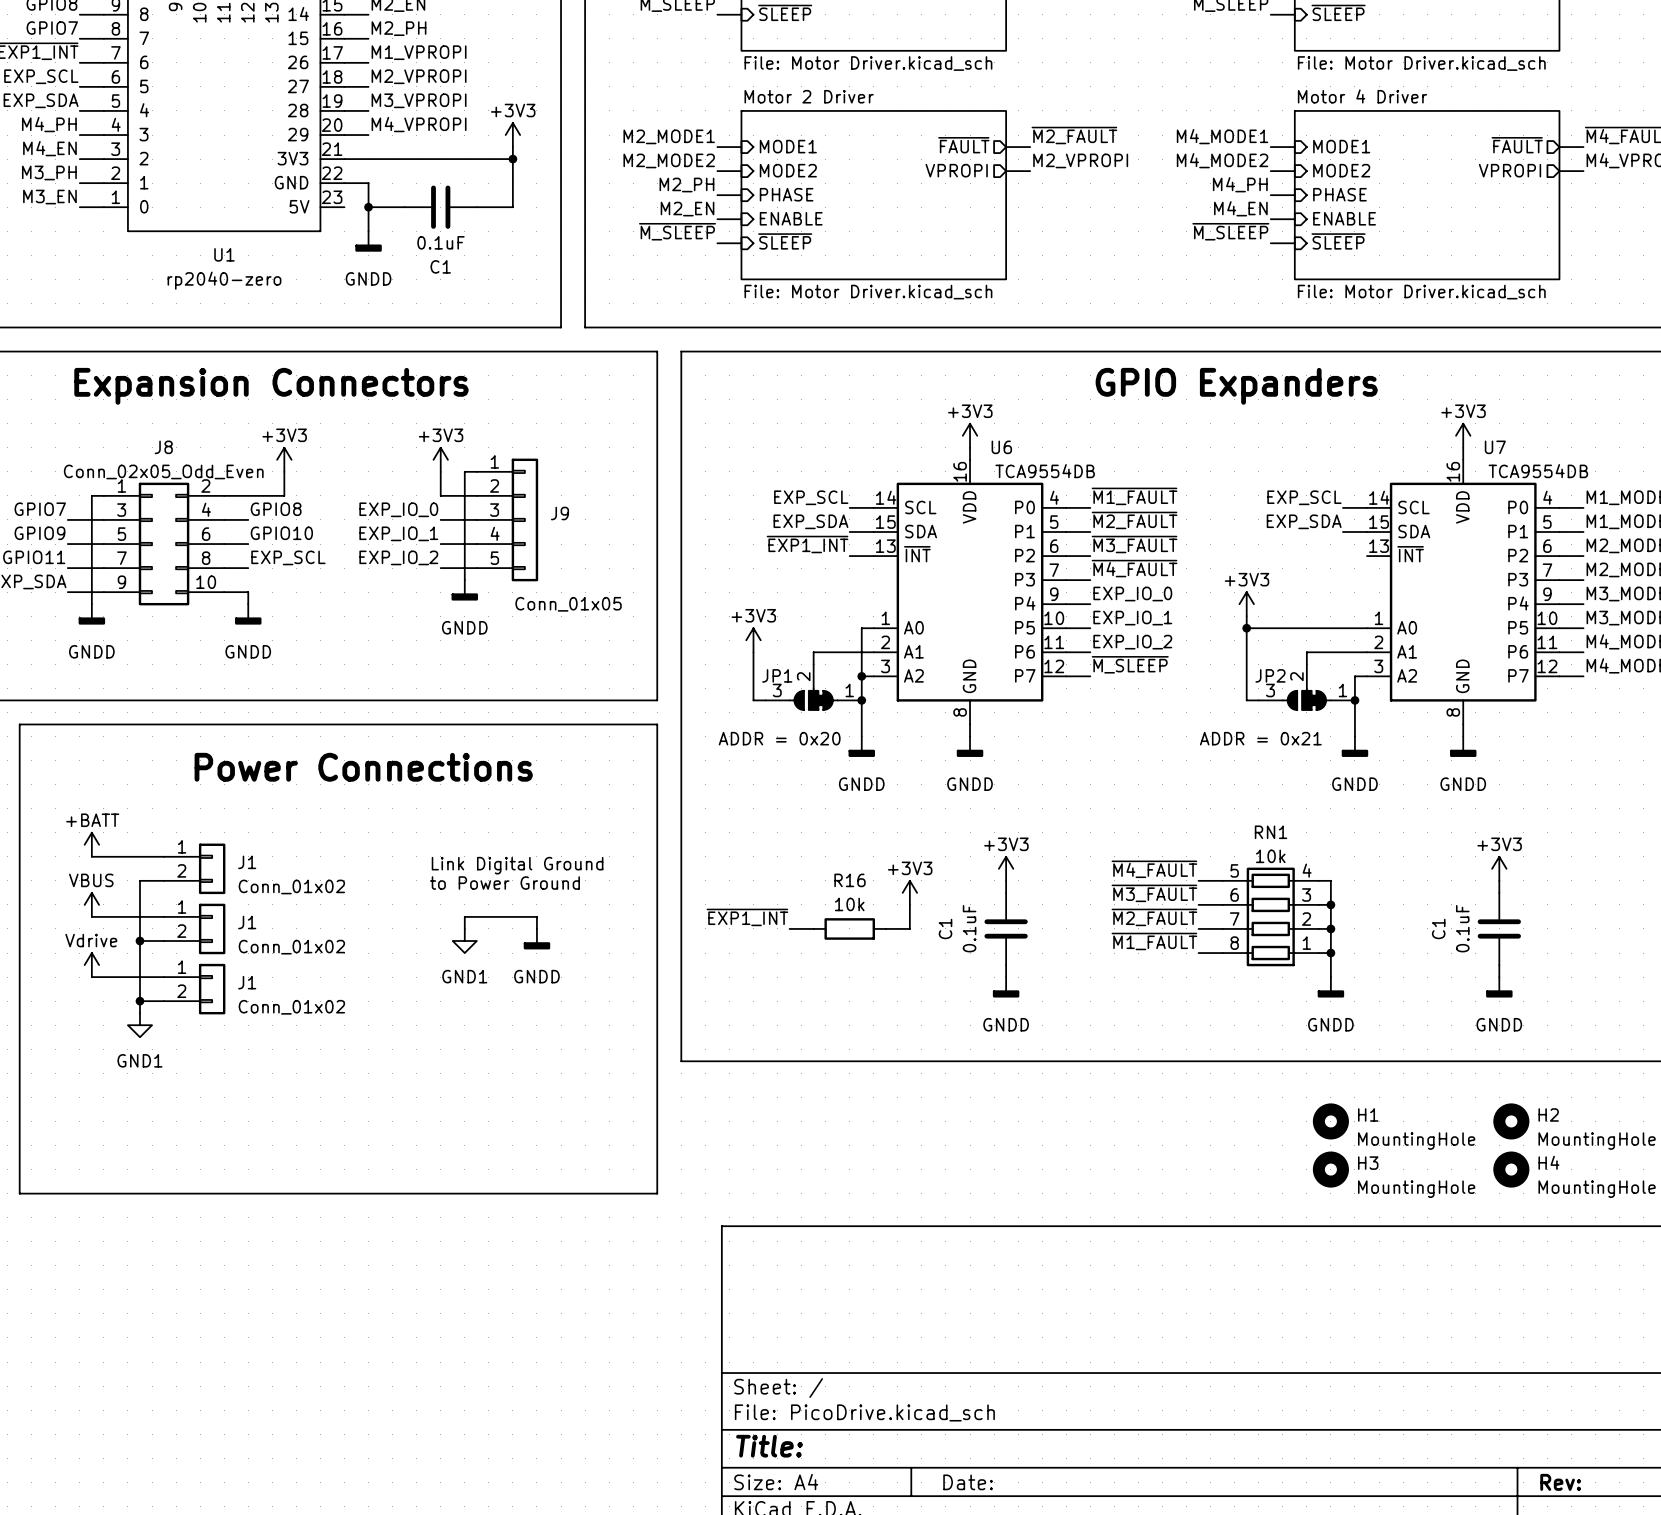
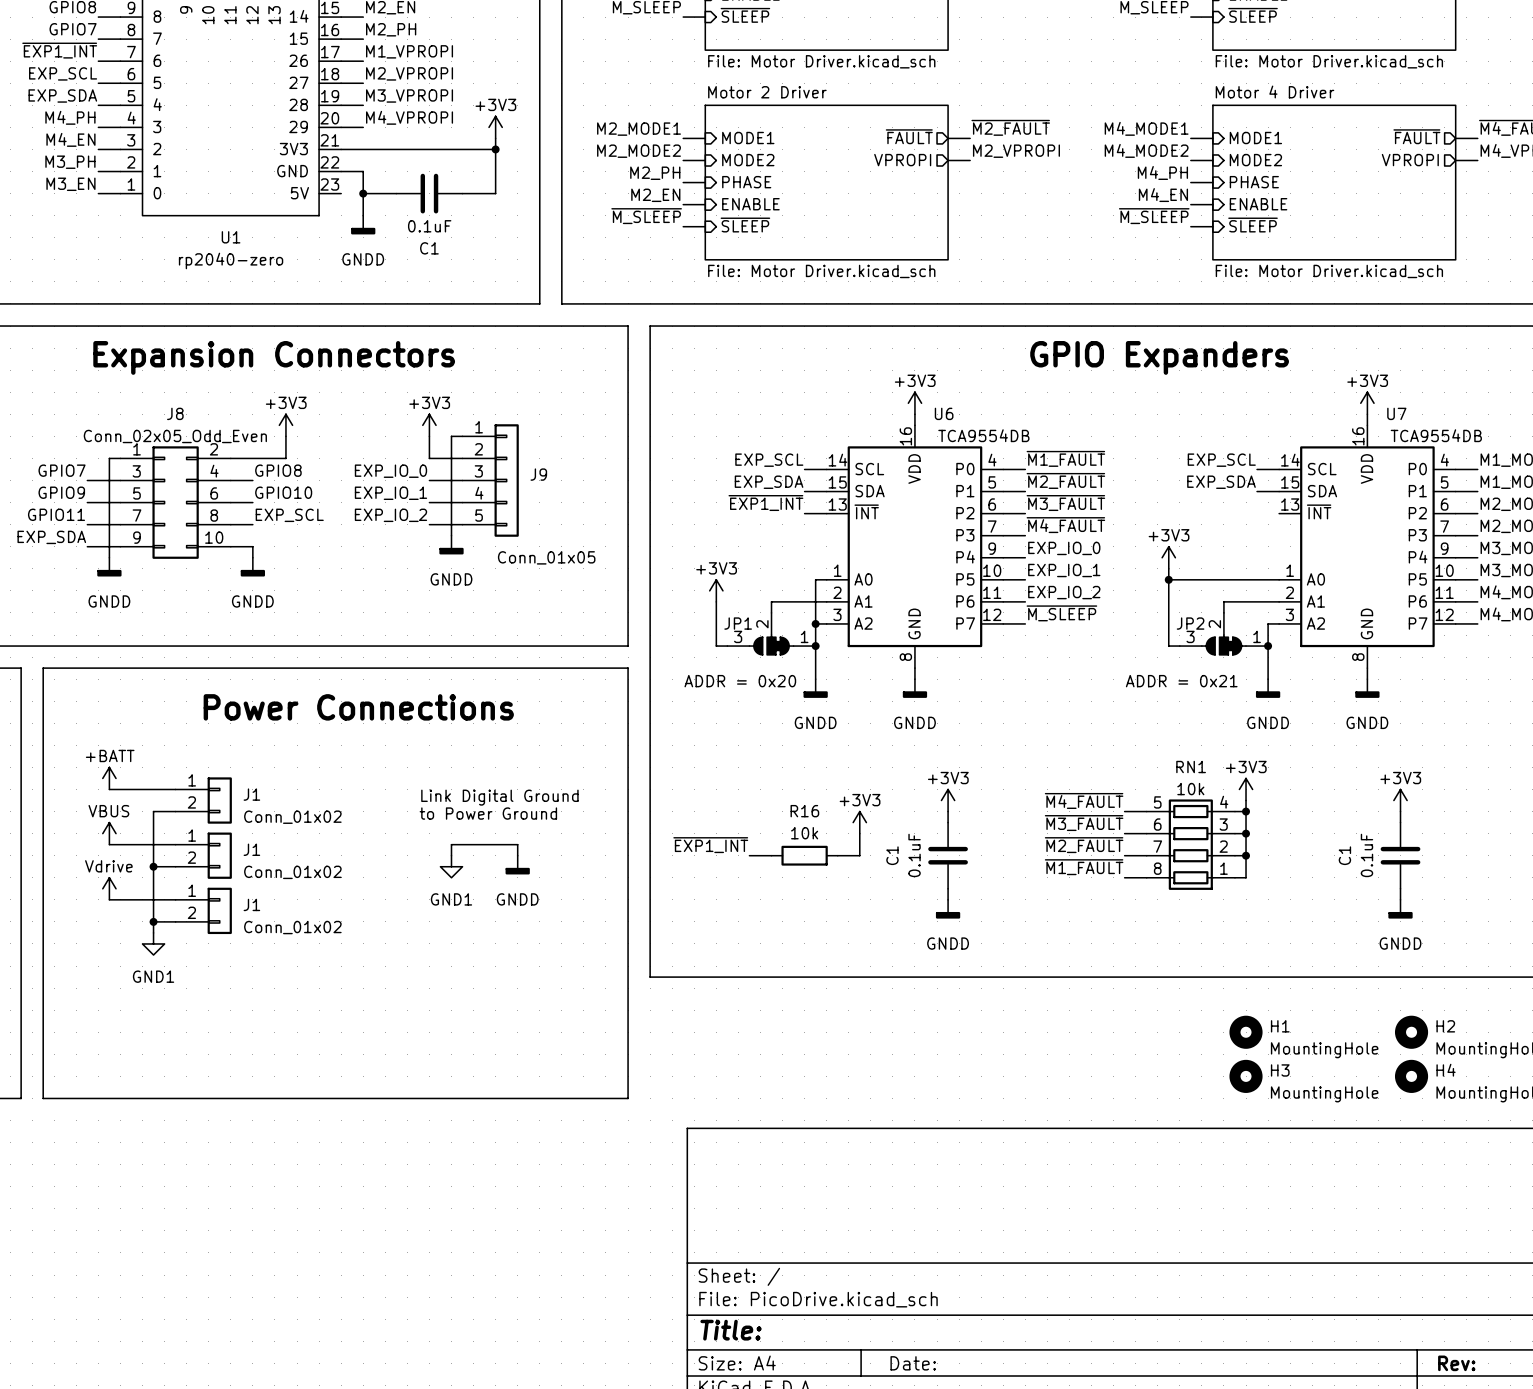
power symbol: none -> +3V3 (1246, 789)
wire: none -> (1246, 800) (1246, 811)
junction: none -> (1246, 811)
wire: (1330, 953) (1330, 977) -> none
junction: (1330, 953) -> none
power symbol: GNDD (1330, 987) -> none

